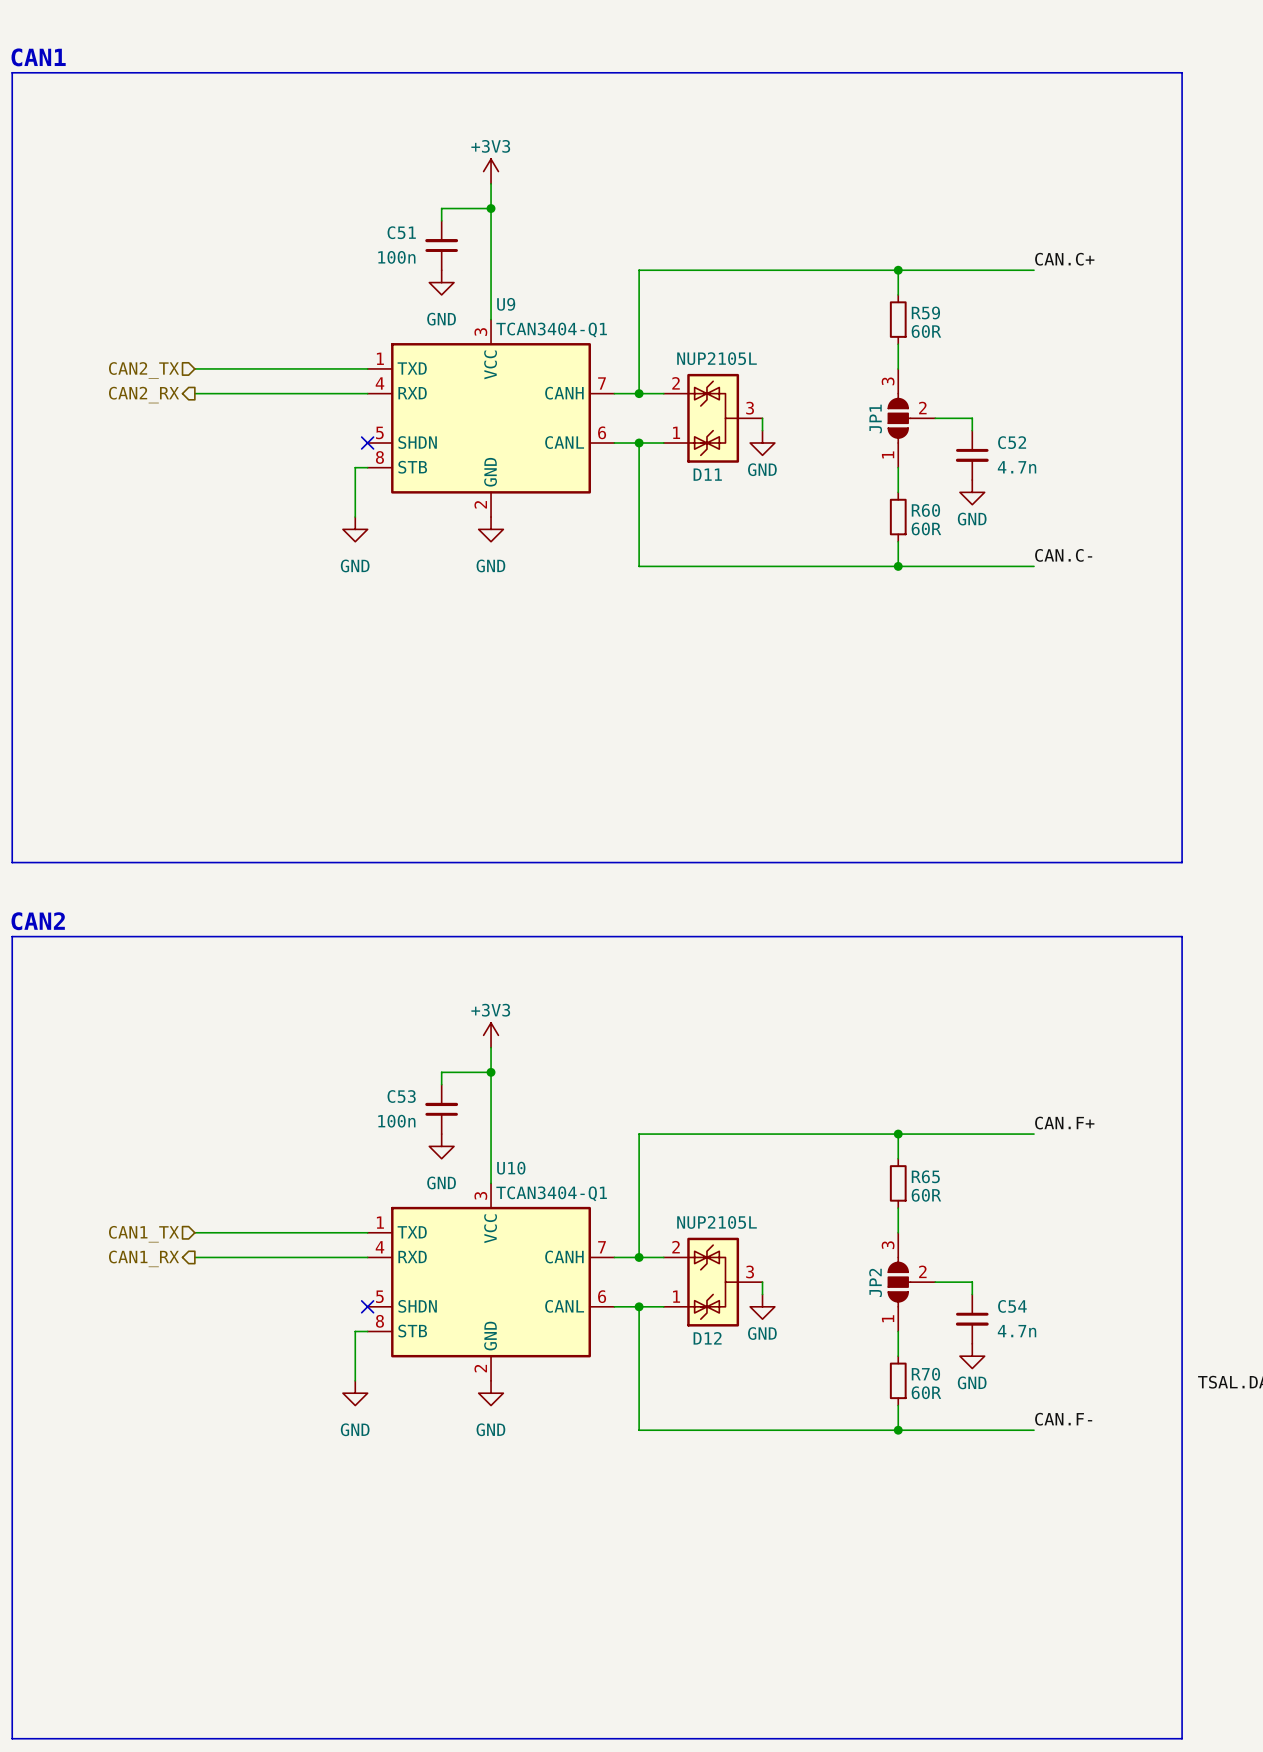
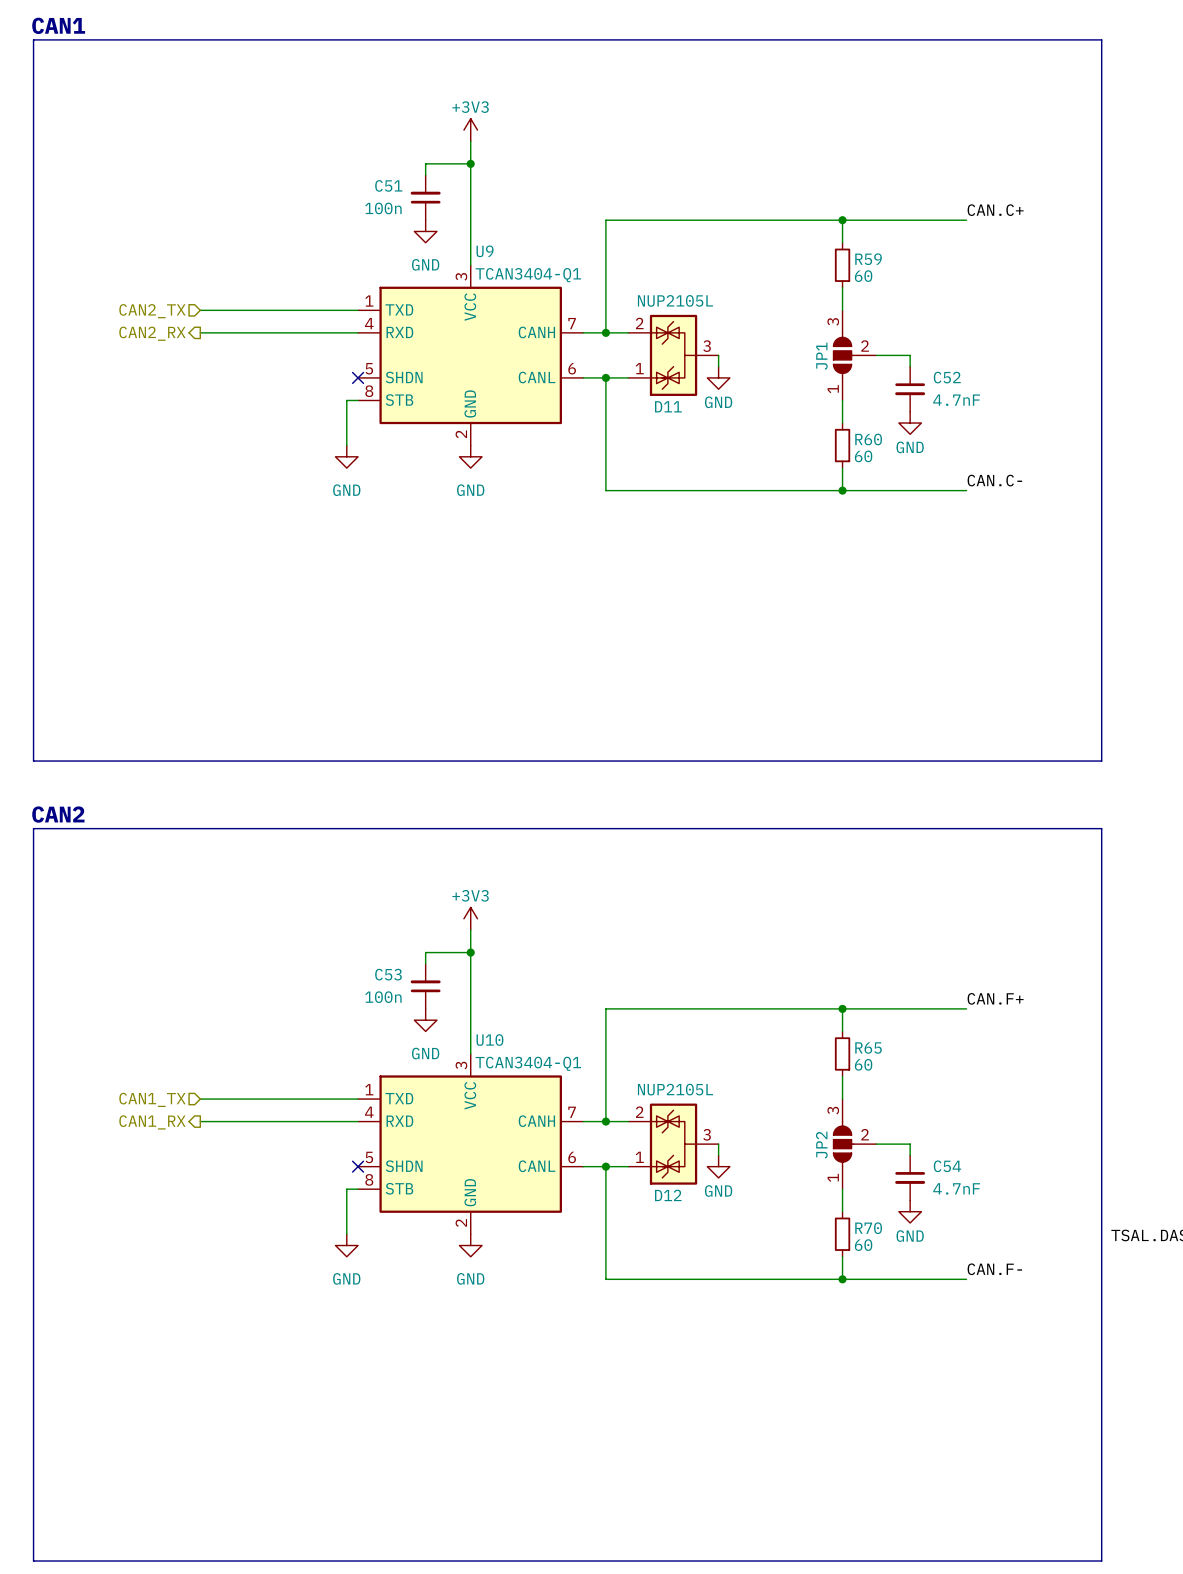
R59 value: 60R (926, 331) -> 60 (863, 276)
C52 value: 4.7n (1017, 467) -> 4.7nF (956, 400)
R60 value: 60R (926, 528) -> 60 (863, 456)
R65 value: 60R (926, 1195) -> 60 (863, 1064)
C54 value: 4.7n (1017, 1331) -> 4.7nF (956, 1188)
R70 value: 60R (926, 1392) -> 60 (863, 1245)

